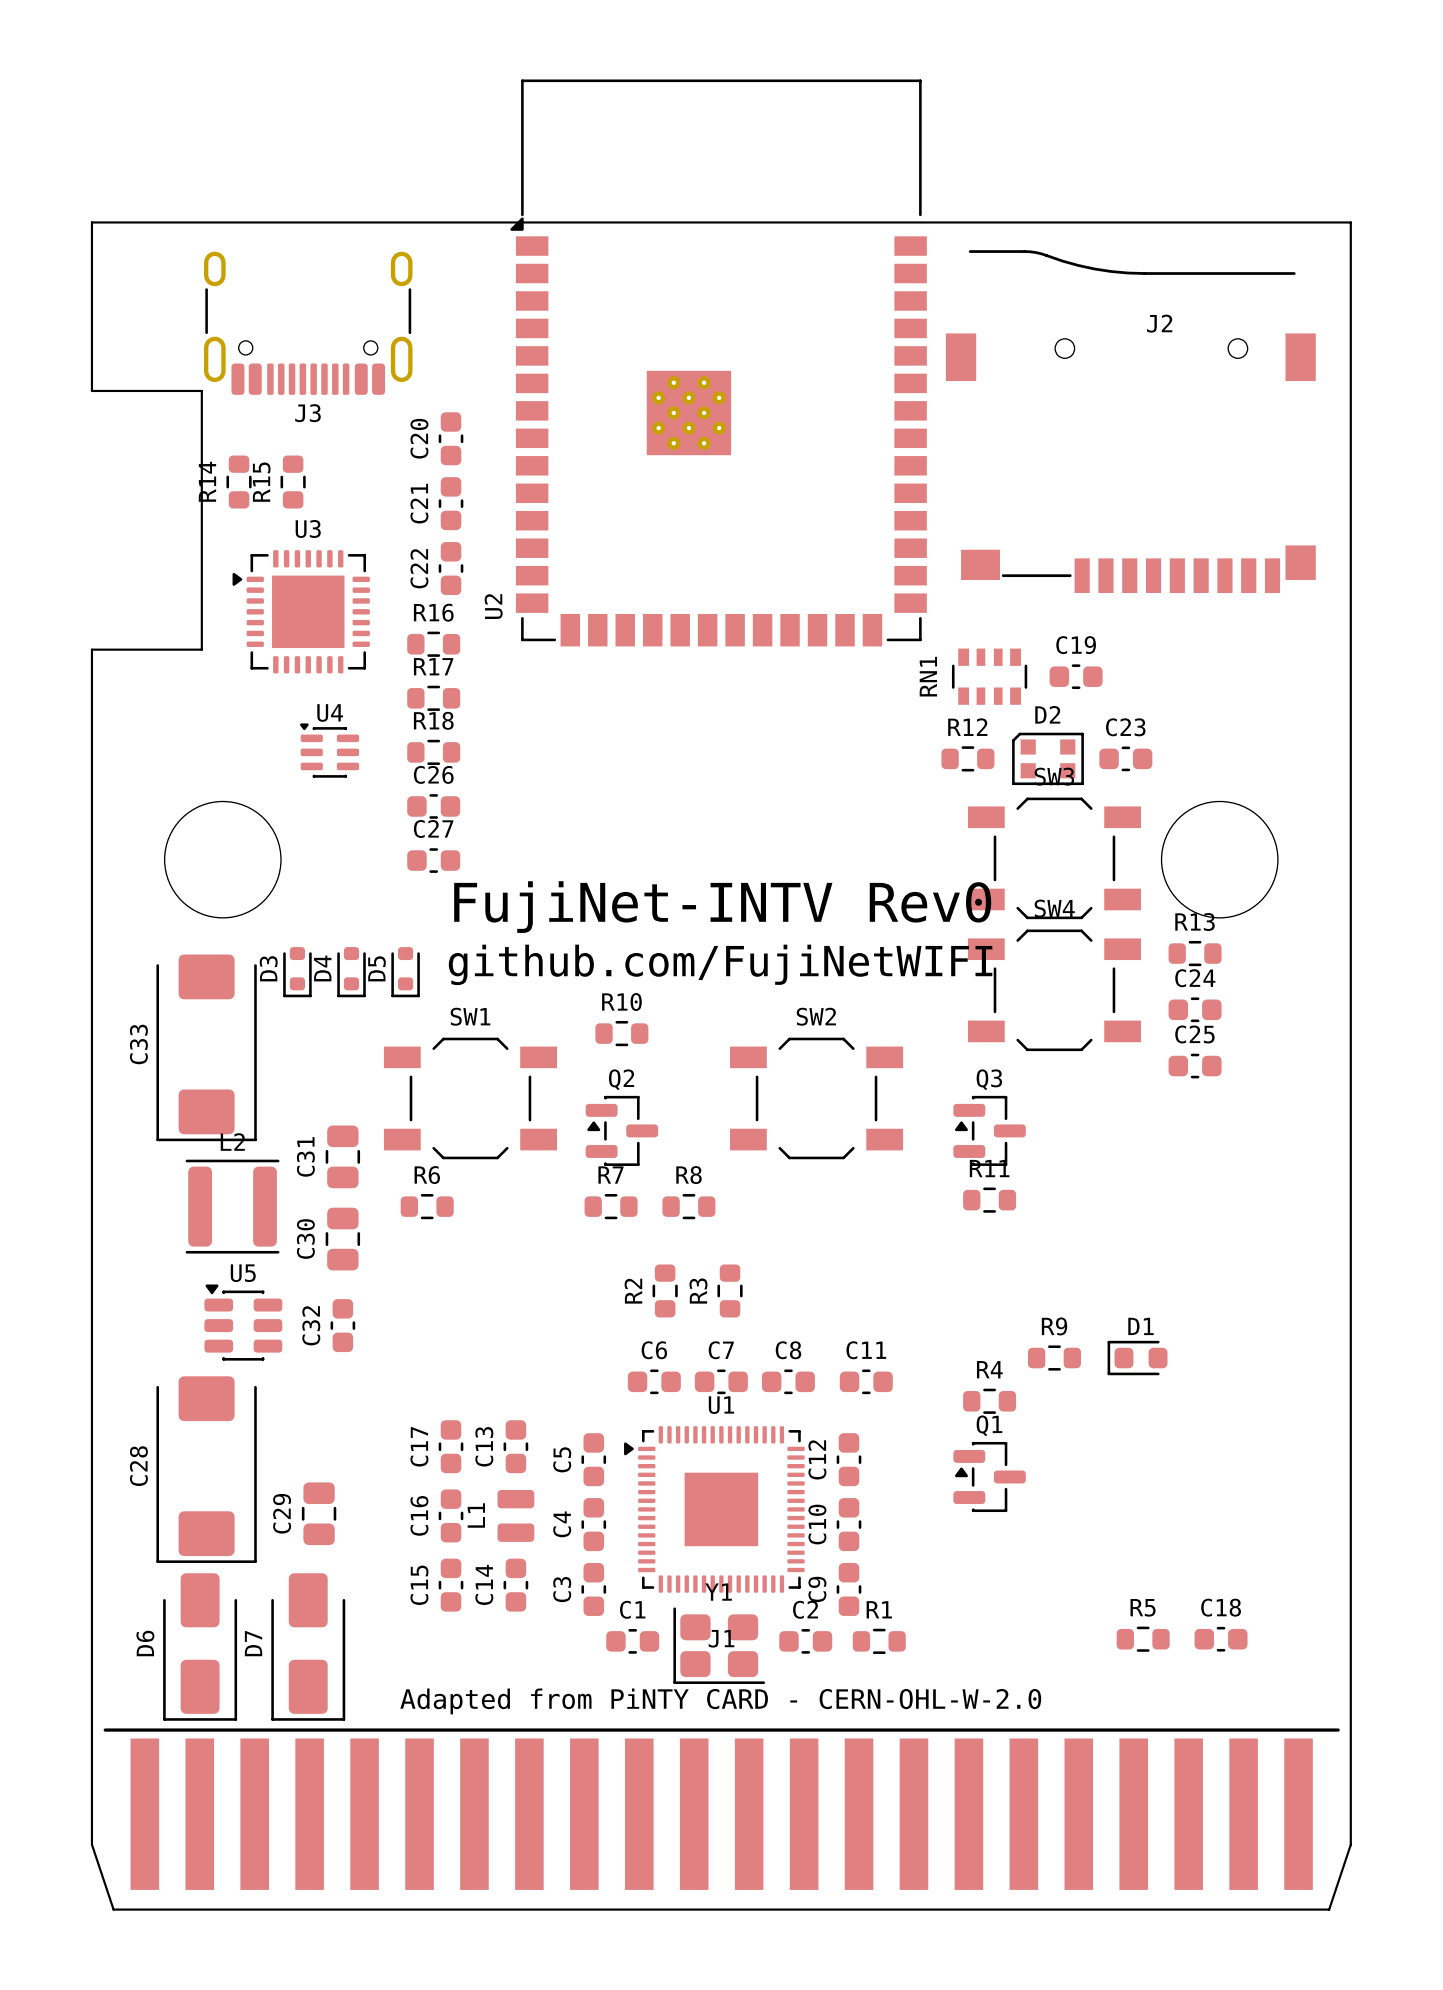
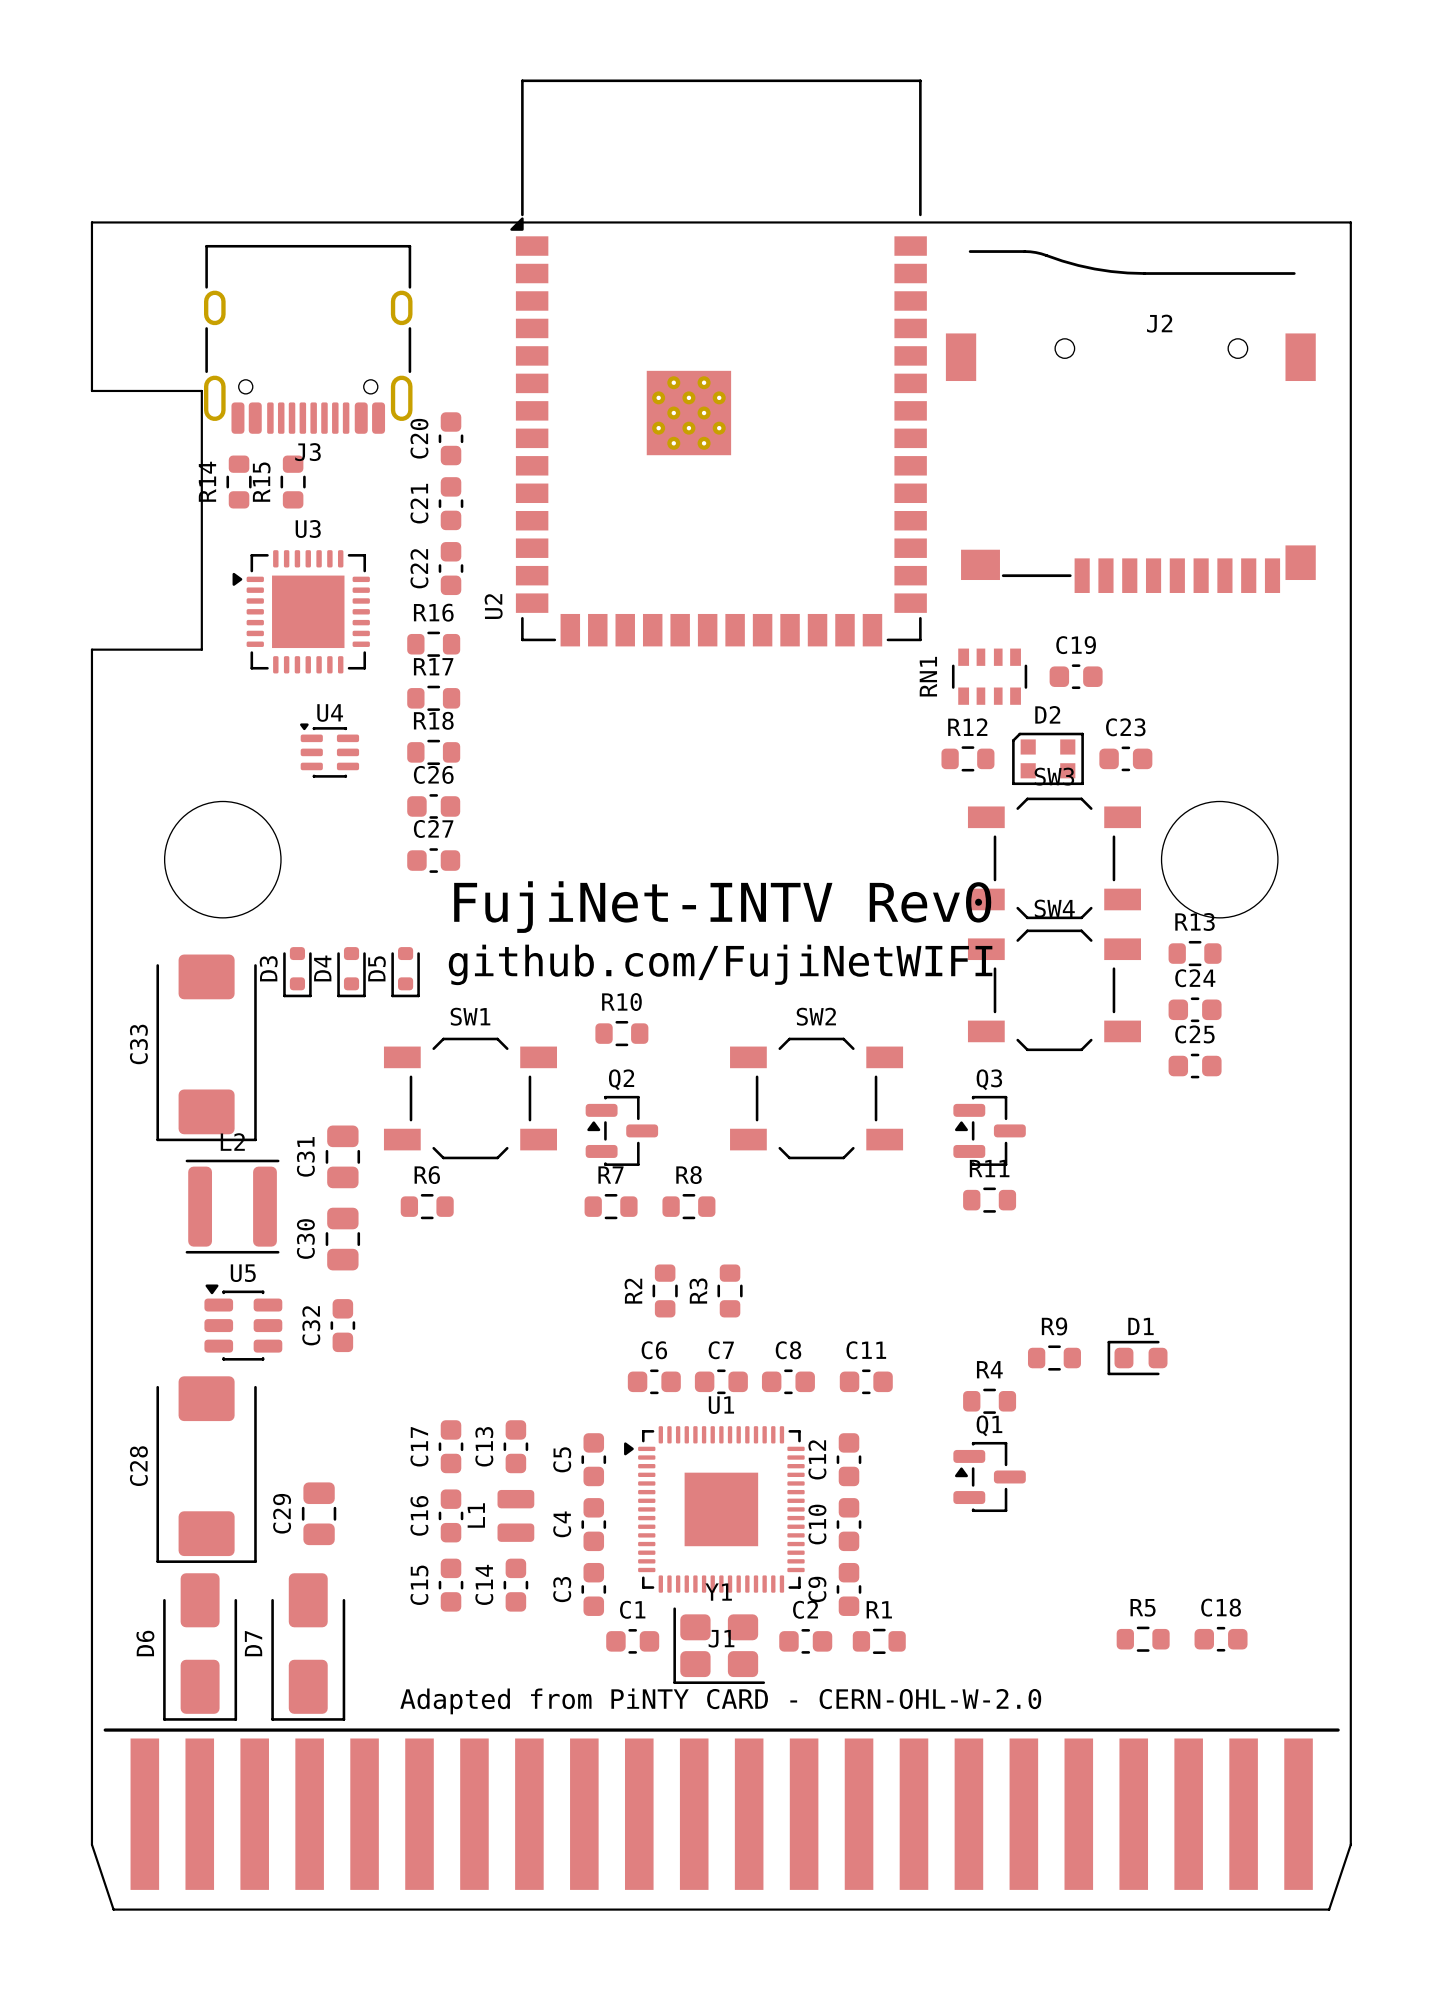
J3 footprint: [204, 251, 413, 395] -> [204, 244, 413, 434]

